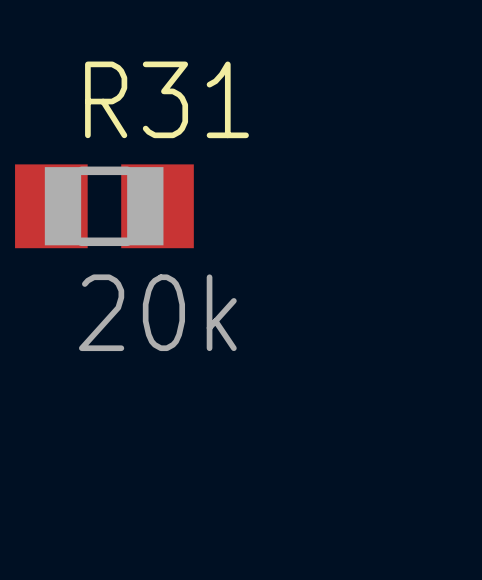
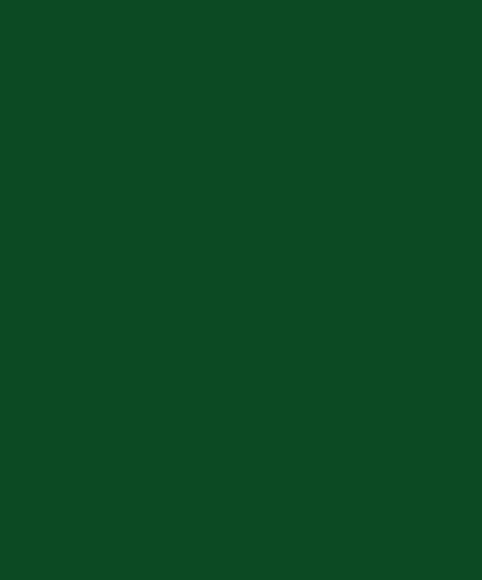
R31: 20k (104, 206) -> none

